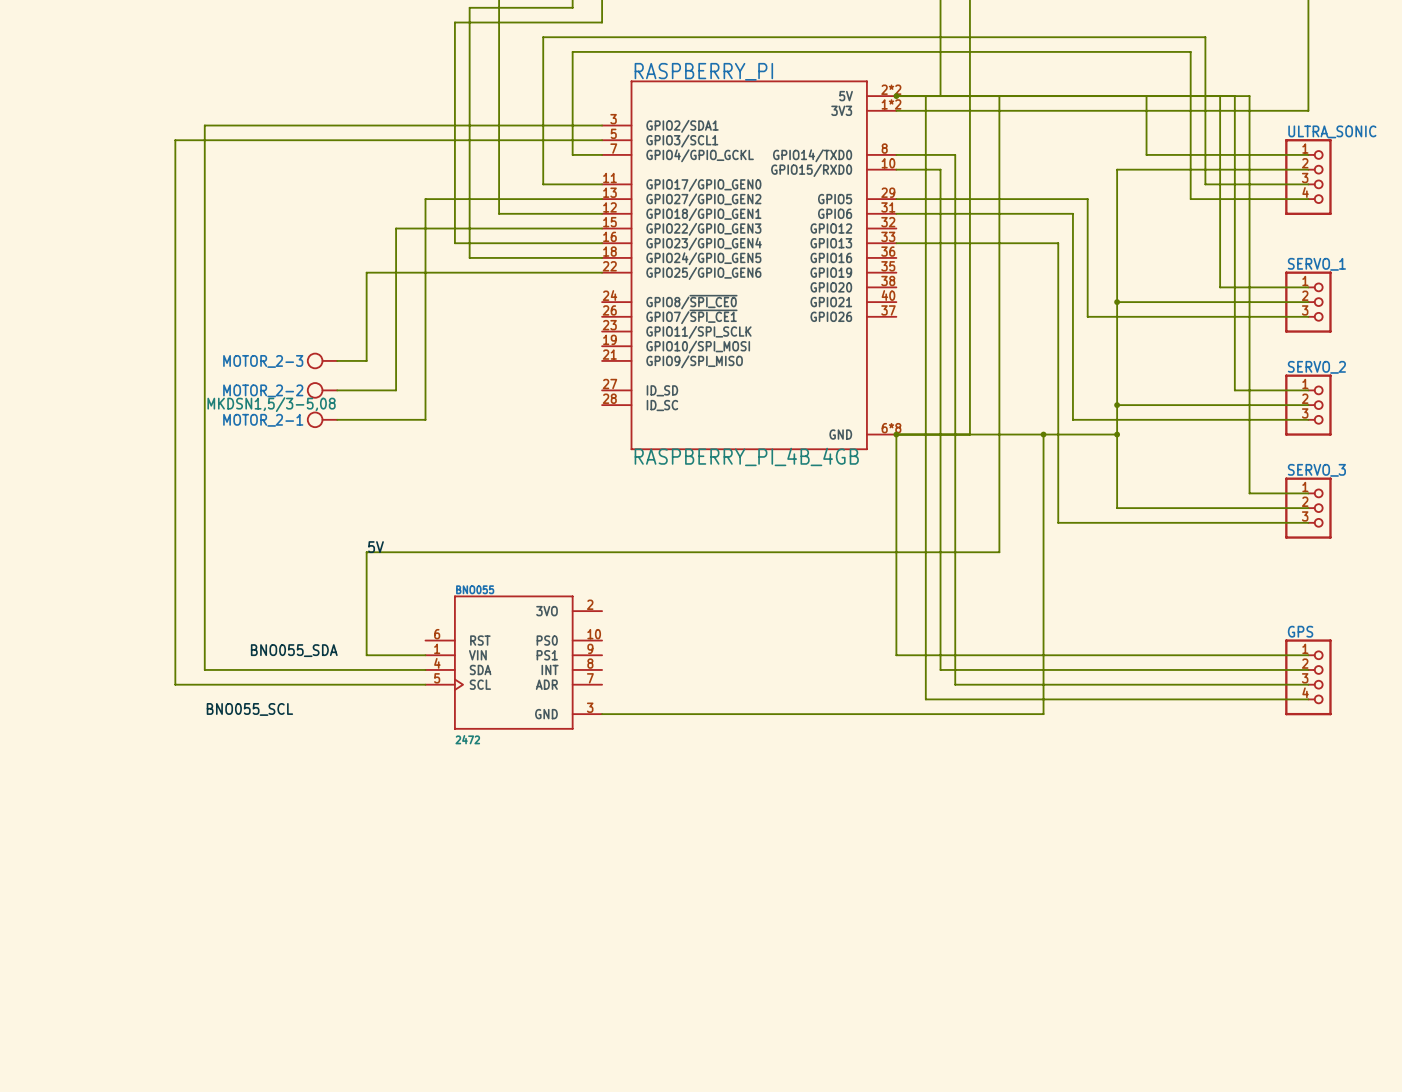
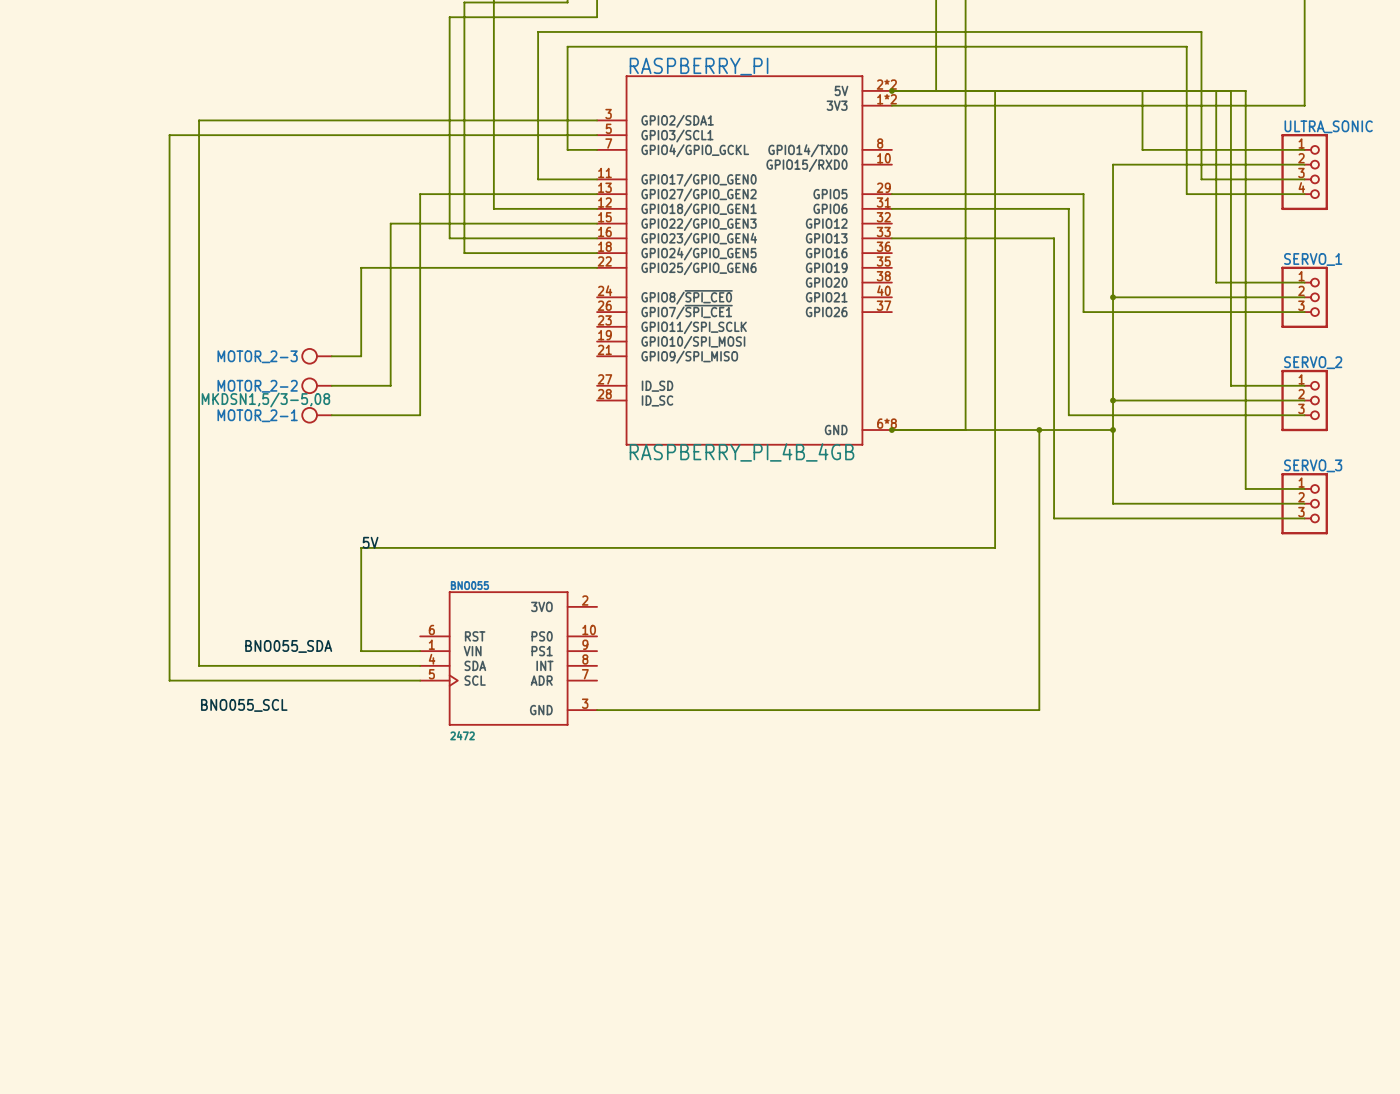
wire: (925, 96) (925, 699) (1308, 699) -> none
wire: (896, 154) (955, 154) (955, 684) (1308, 684) -> none
wire: (896, 169) (940, 169) (940, 669) (1308, 669) -> none
wire: (896, 434) (896, 655) (1308, 655) -> none
GPS: (1308, 677) -> none

